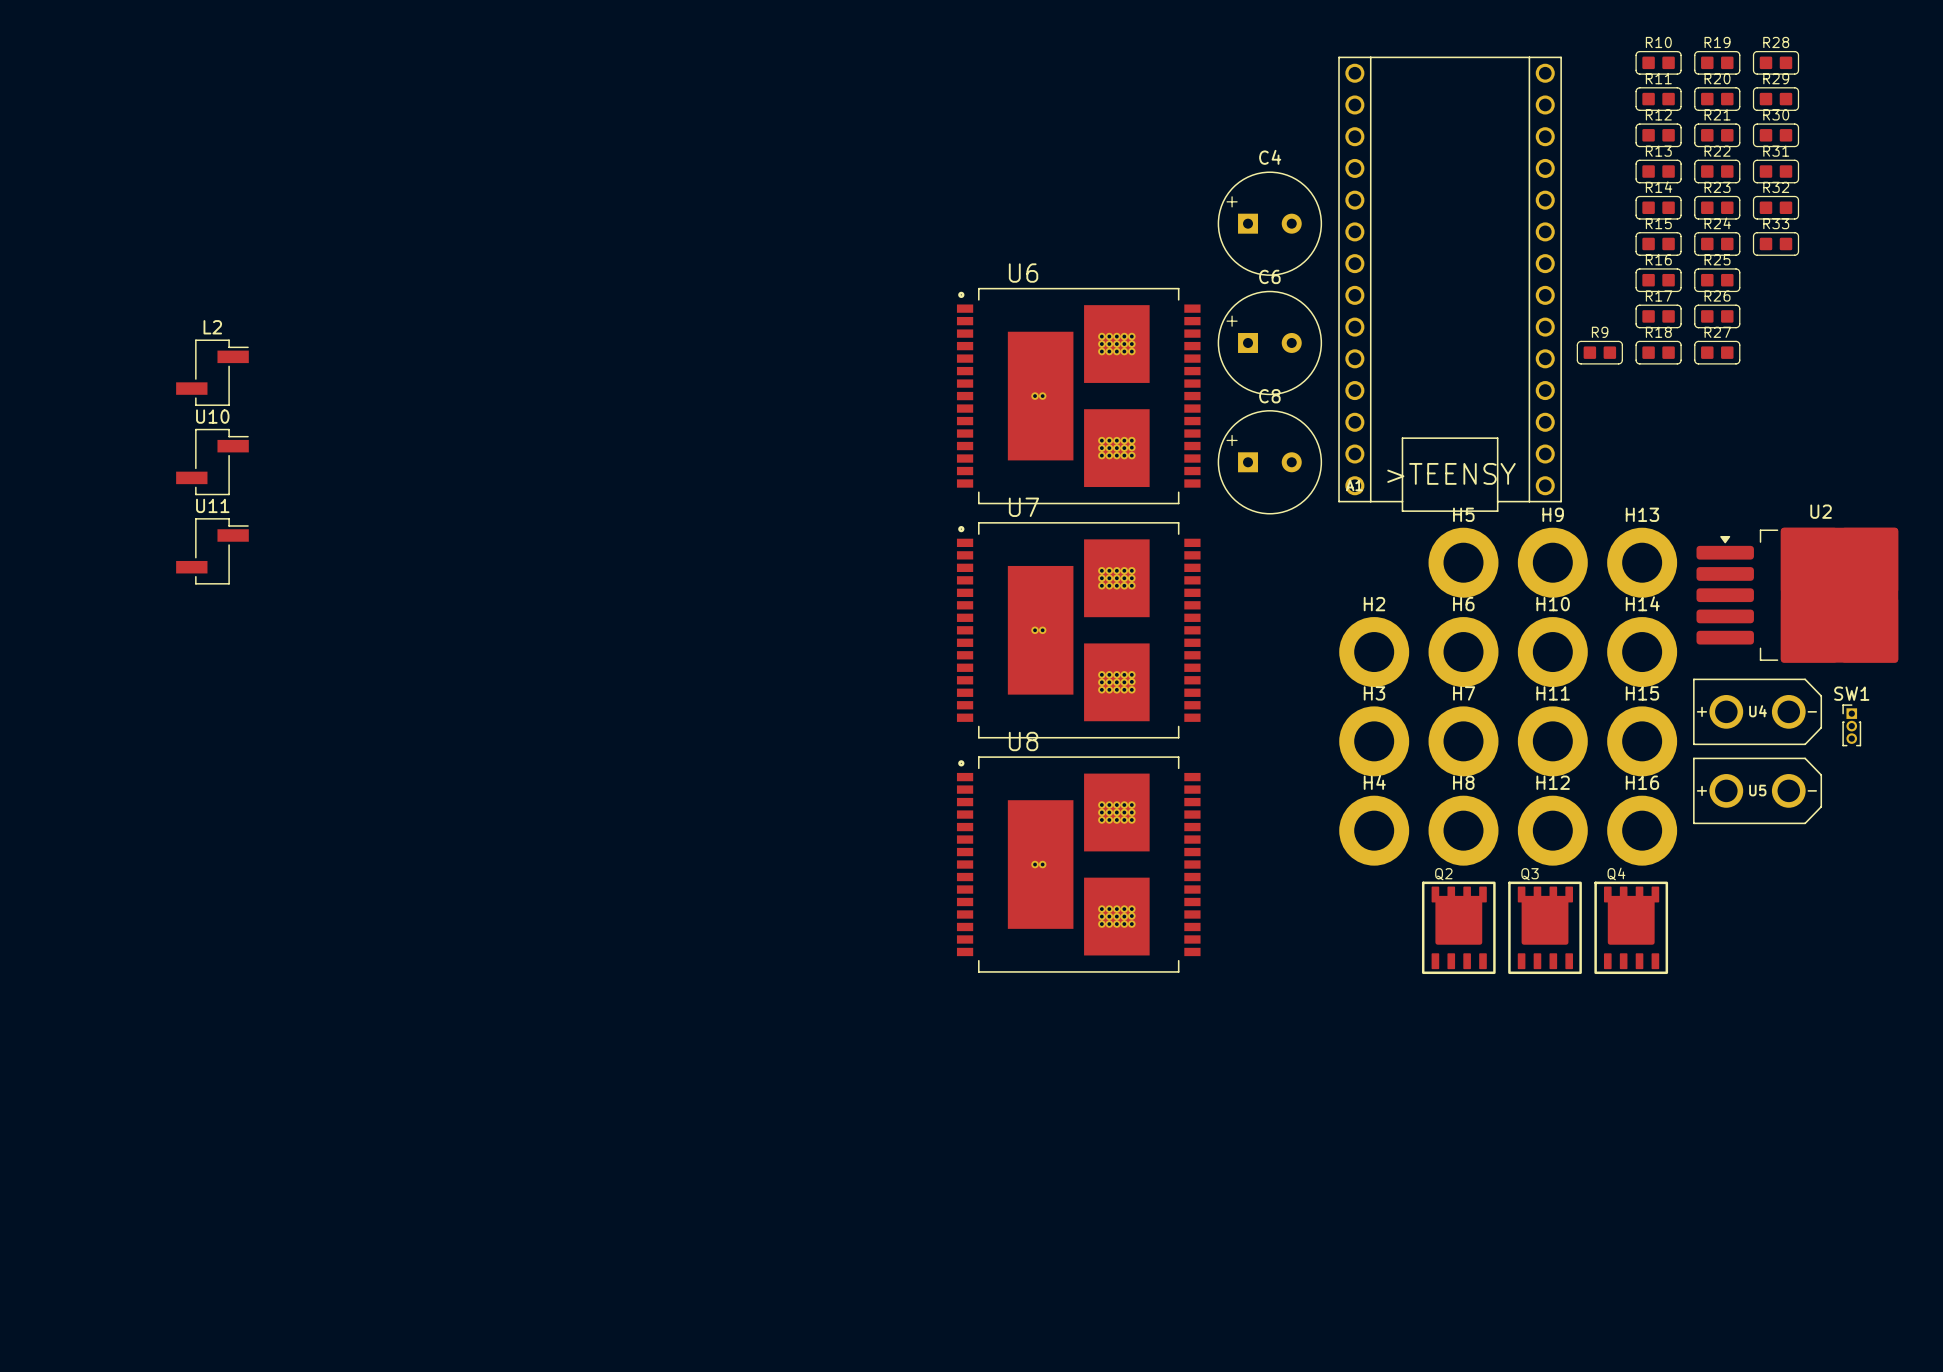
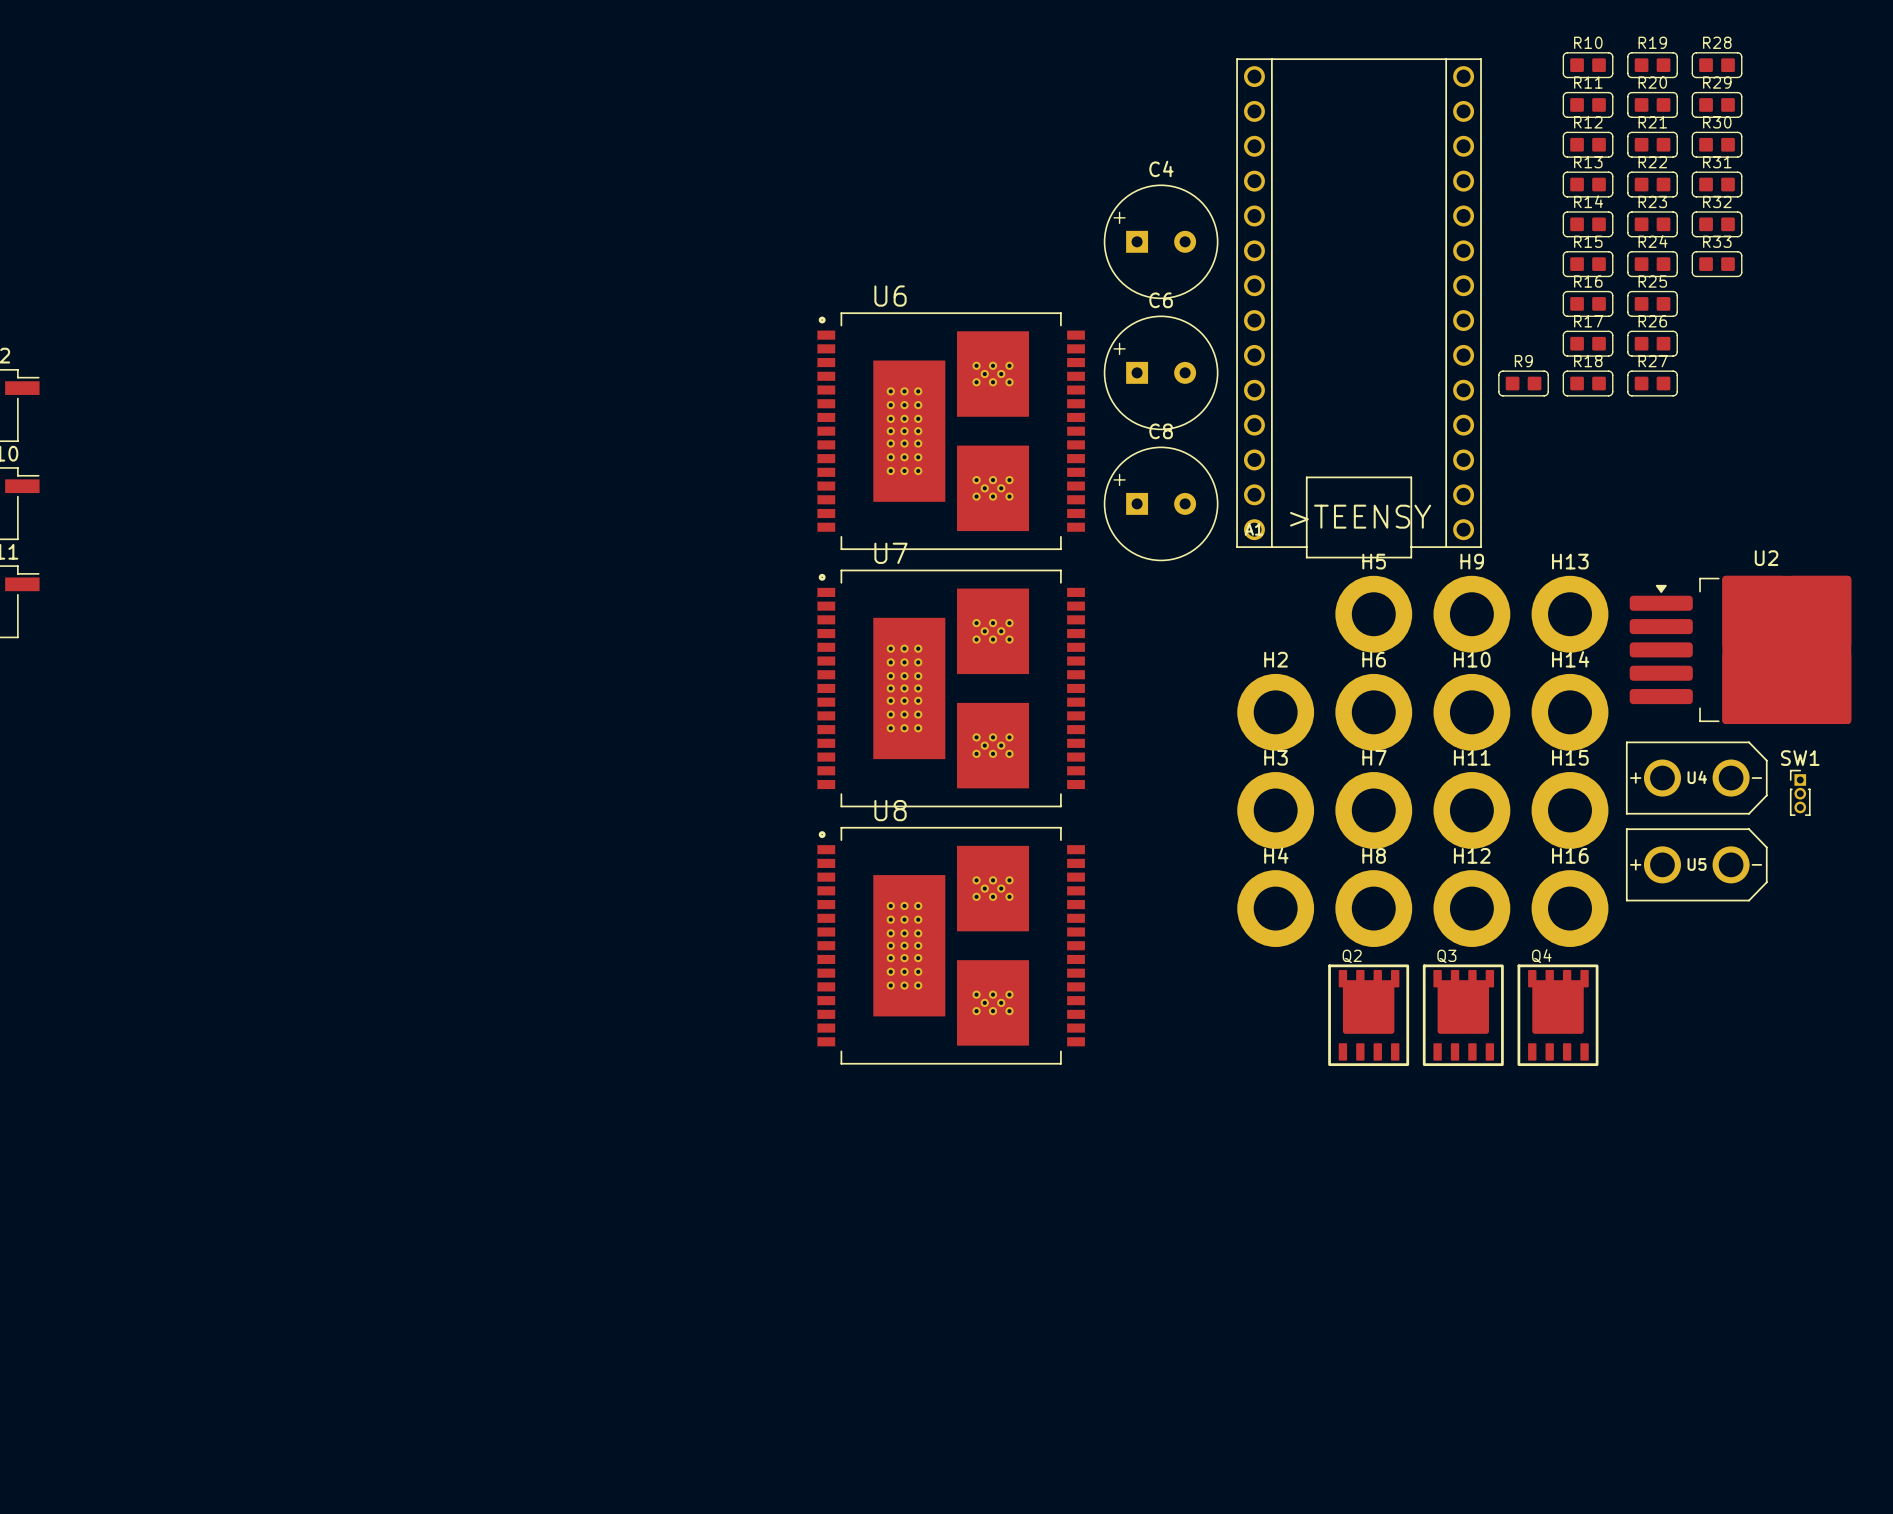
U6 footprint: [956, 287, 1201, 505] -> [817, 312, 1085, 551]
U7 footprint: [956, 522, 1201, 739] -> [817, 569, 1085, 808]
U8 footprint: [956, 756, 1201, 973] -> [817, 826, 1085, 1065]

